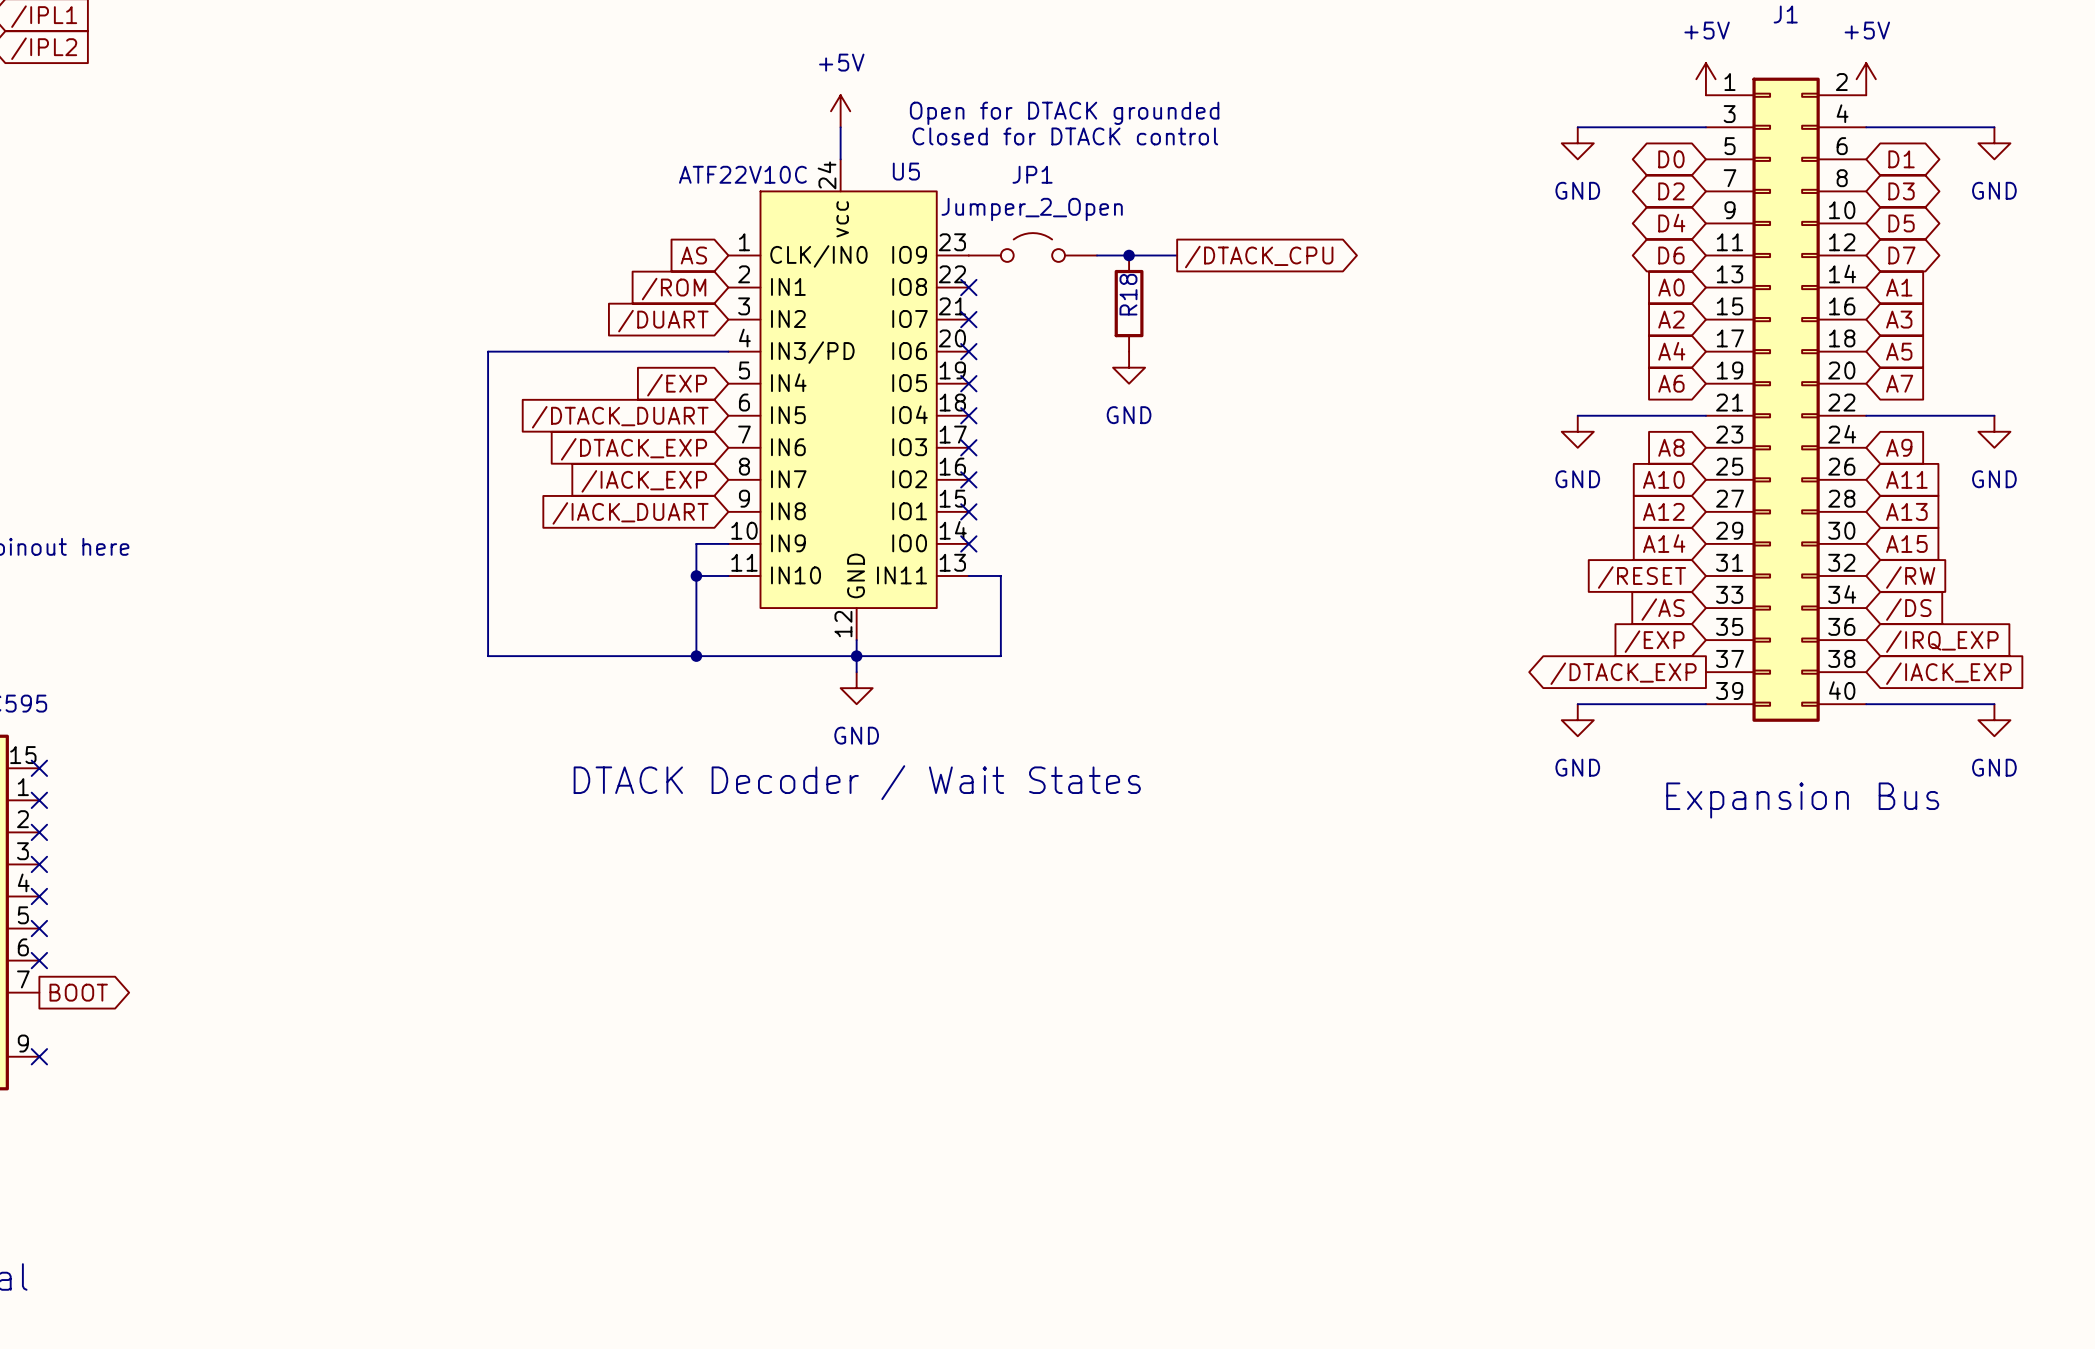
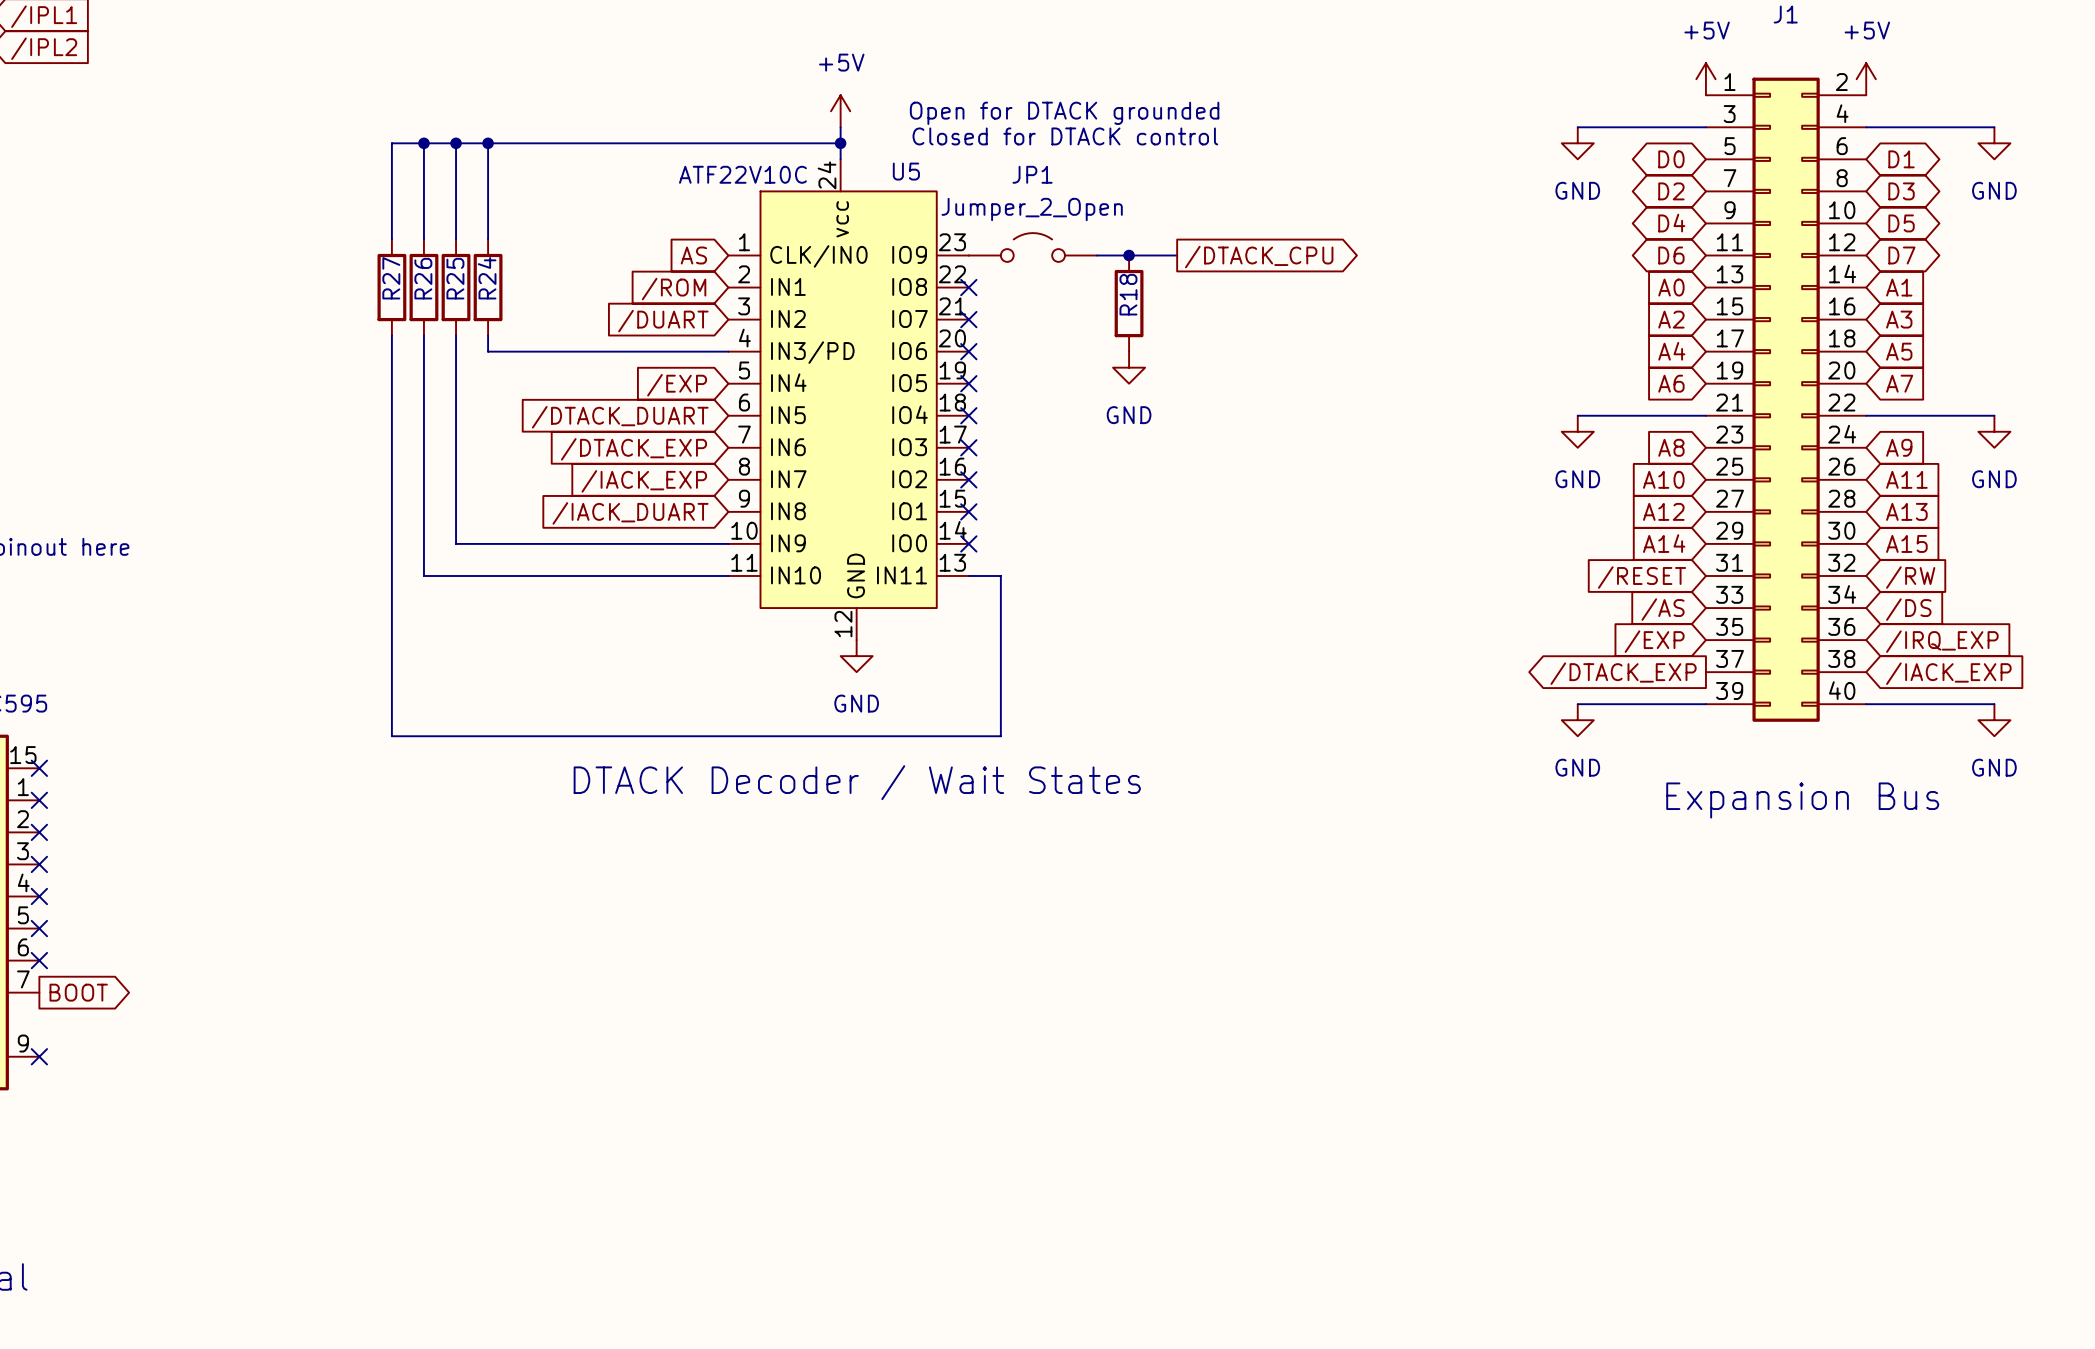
wire: none -> (423, 143) (423, 239)
junction: none -> (423, 143)
wire: none -> (456, 143) (456, 239)
junction: none -> (456, 143)
wire: none -> (488, 143) (488, 239)
junction: none -> (488, 143)
wire: none -> (840, 143) (391, 143) (391, 239)
junction: none -> (840, 143)
R27: none -> (391, 287)
R26: none -> (423, 287)
R25: none -> (456, 287)
R24: none -> (488, 287)
wire: none -> (423, 335) (423, 575) (696, 575)
wire: none -> (488, 335) (488, 351)
wire: (488, 351) (488, 656) (1000, 656) -> (391, 335) (391, 736) (1000, 736) (1000, 656)
wire: (696, 543) (696, 656) -> (696, 543) (456, 543) (456, 335)
junction: (696, 575) -> none
junction: (696, 656) -> none
junction: (856, 656) -> none
power symbol position: GND (856, 688) -> GND (856, 656)

